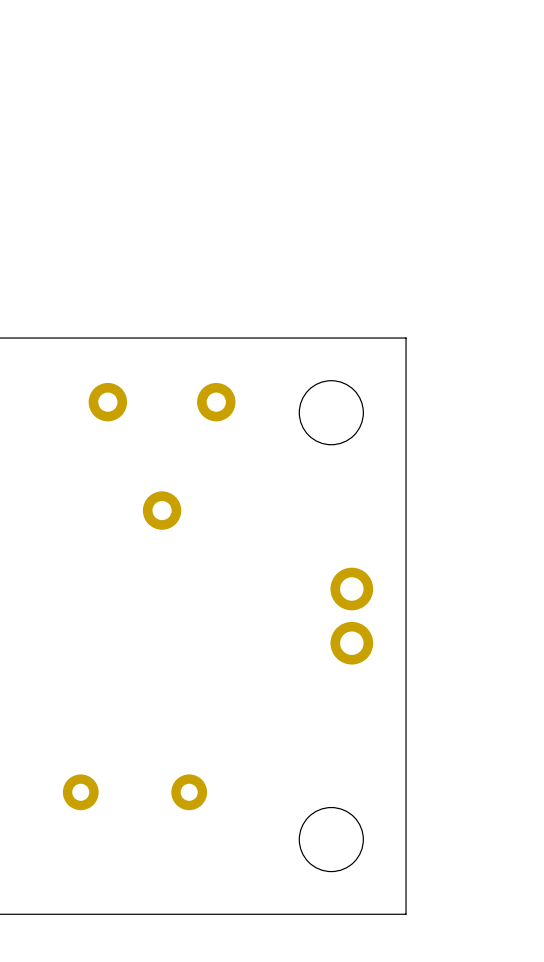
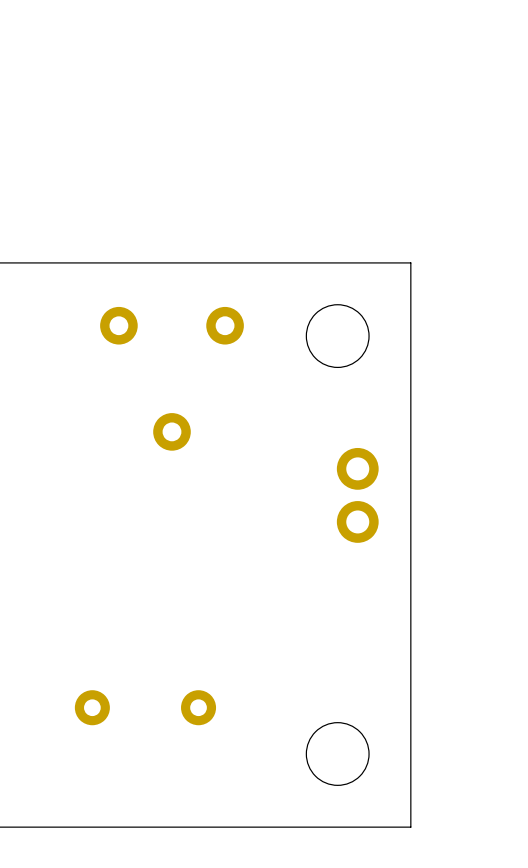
part position: (351, 616) -> (357, 495)

